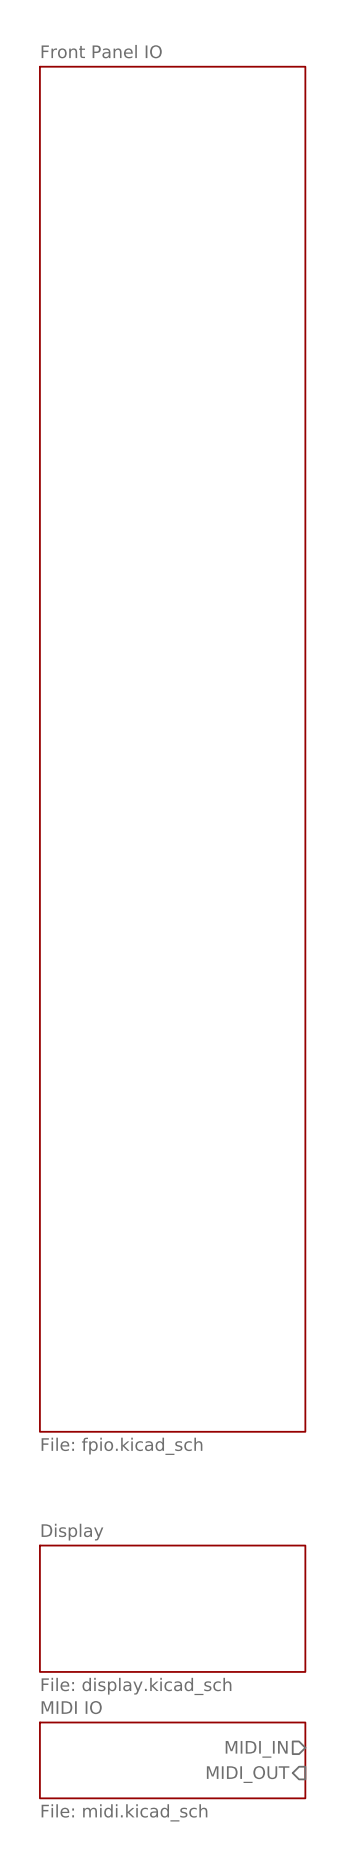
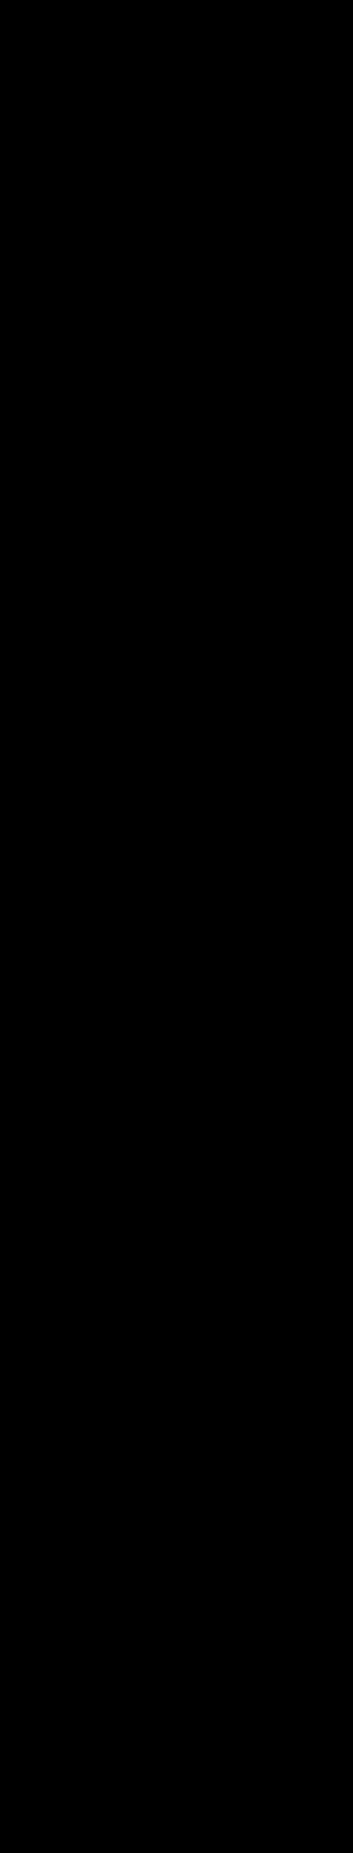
sheet Front Panel IO: File: fpio.kicad_sch (172, 749) -> none
sheet Display: File: display.kicad_sch (172, 1608) -> none
sheet pin: MIDI_IN (256, 1749) -> none
sheet MIDI IO: File: midi.kicad_sch (172, 1760) -> none
sheet pin: MIDI_OUT (248, 1774) -> none

